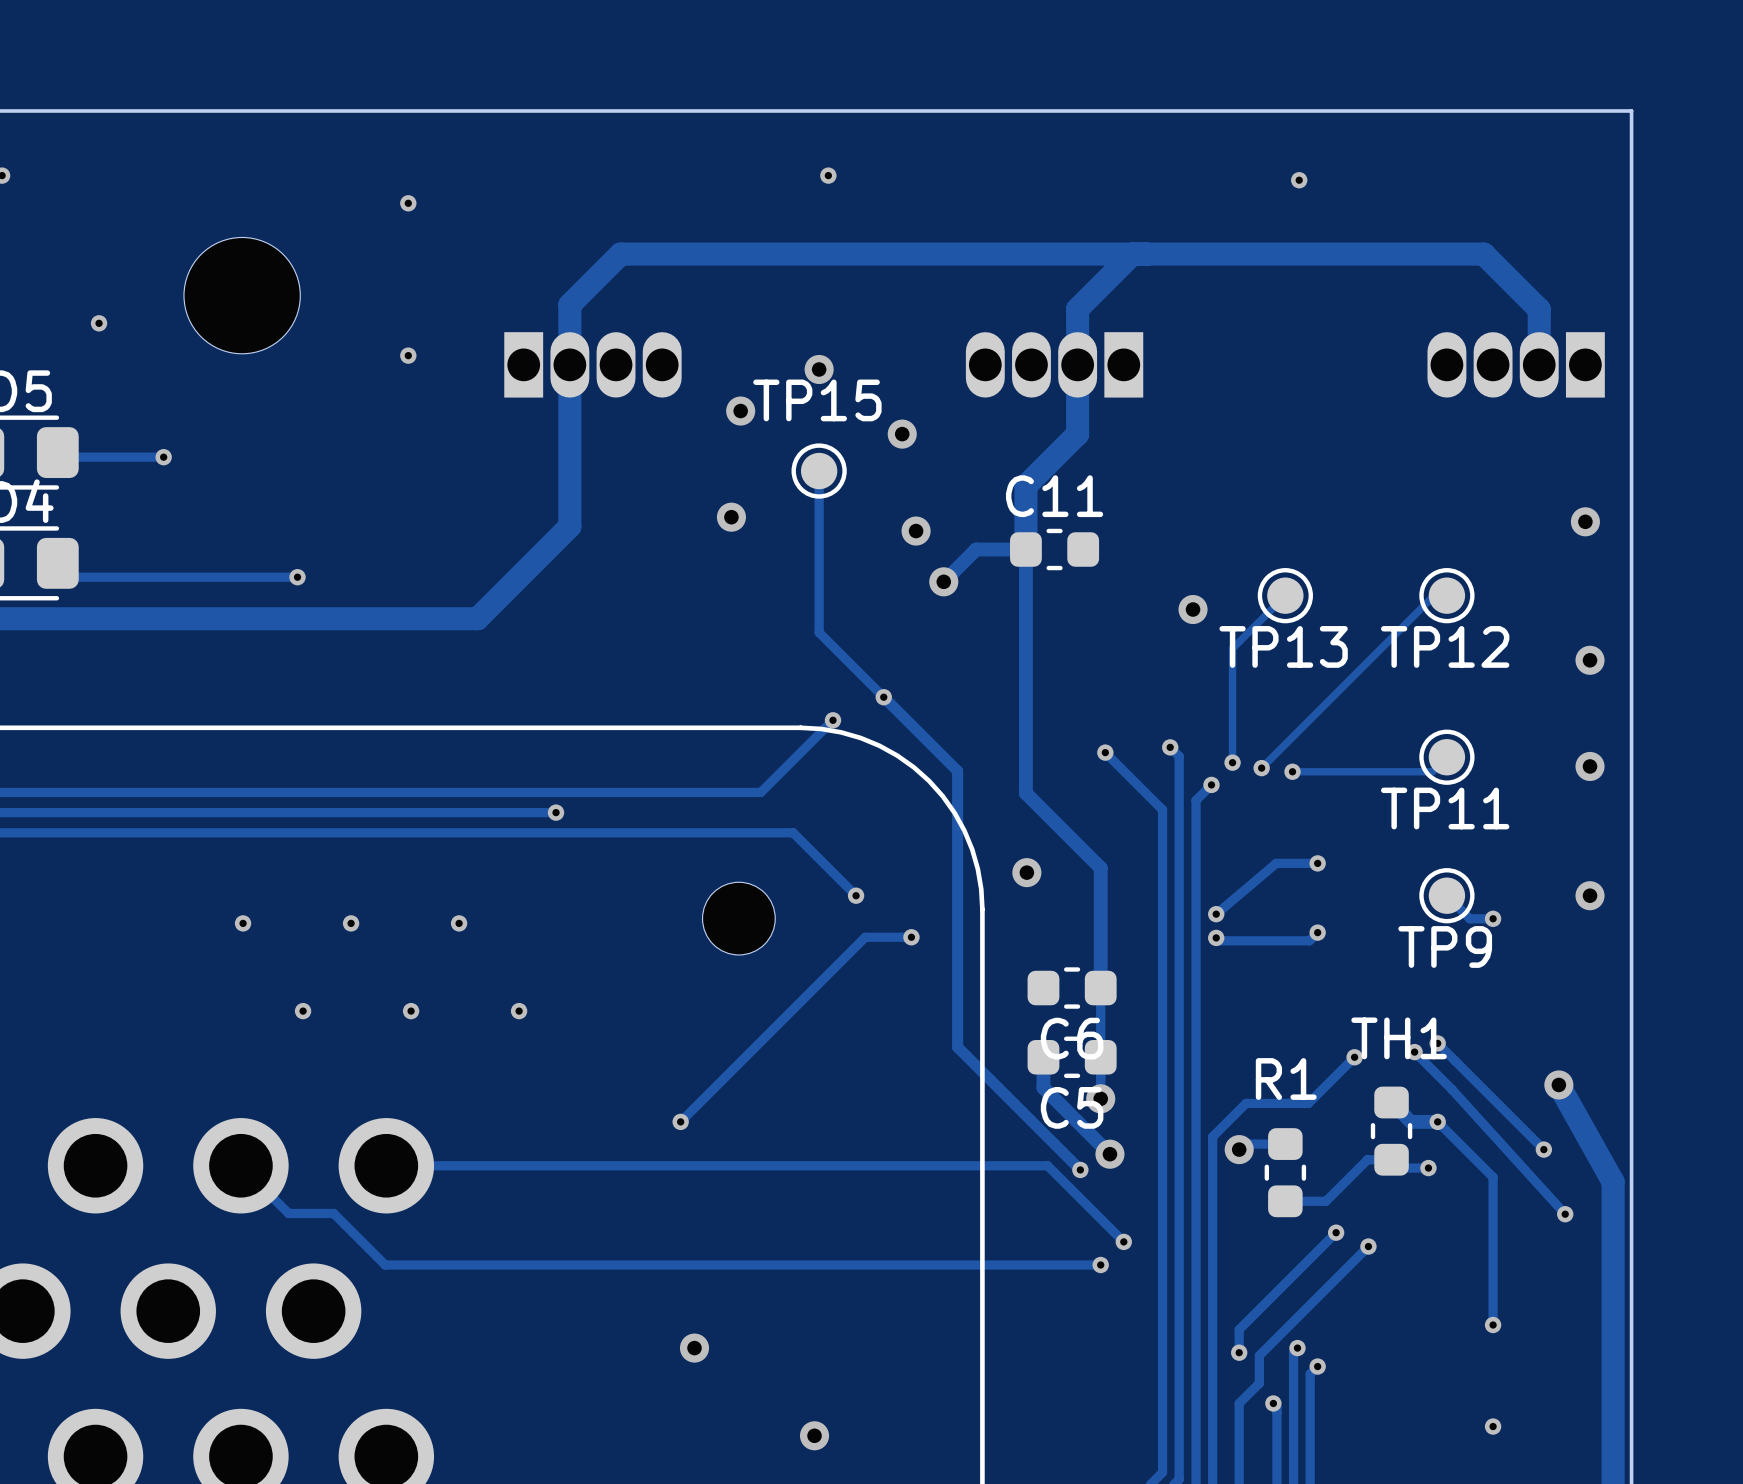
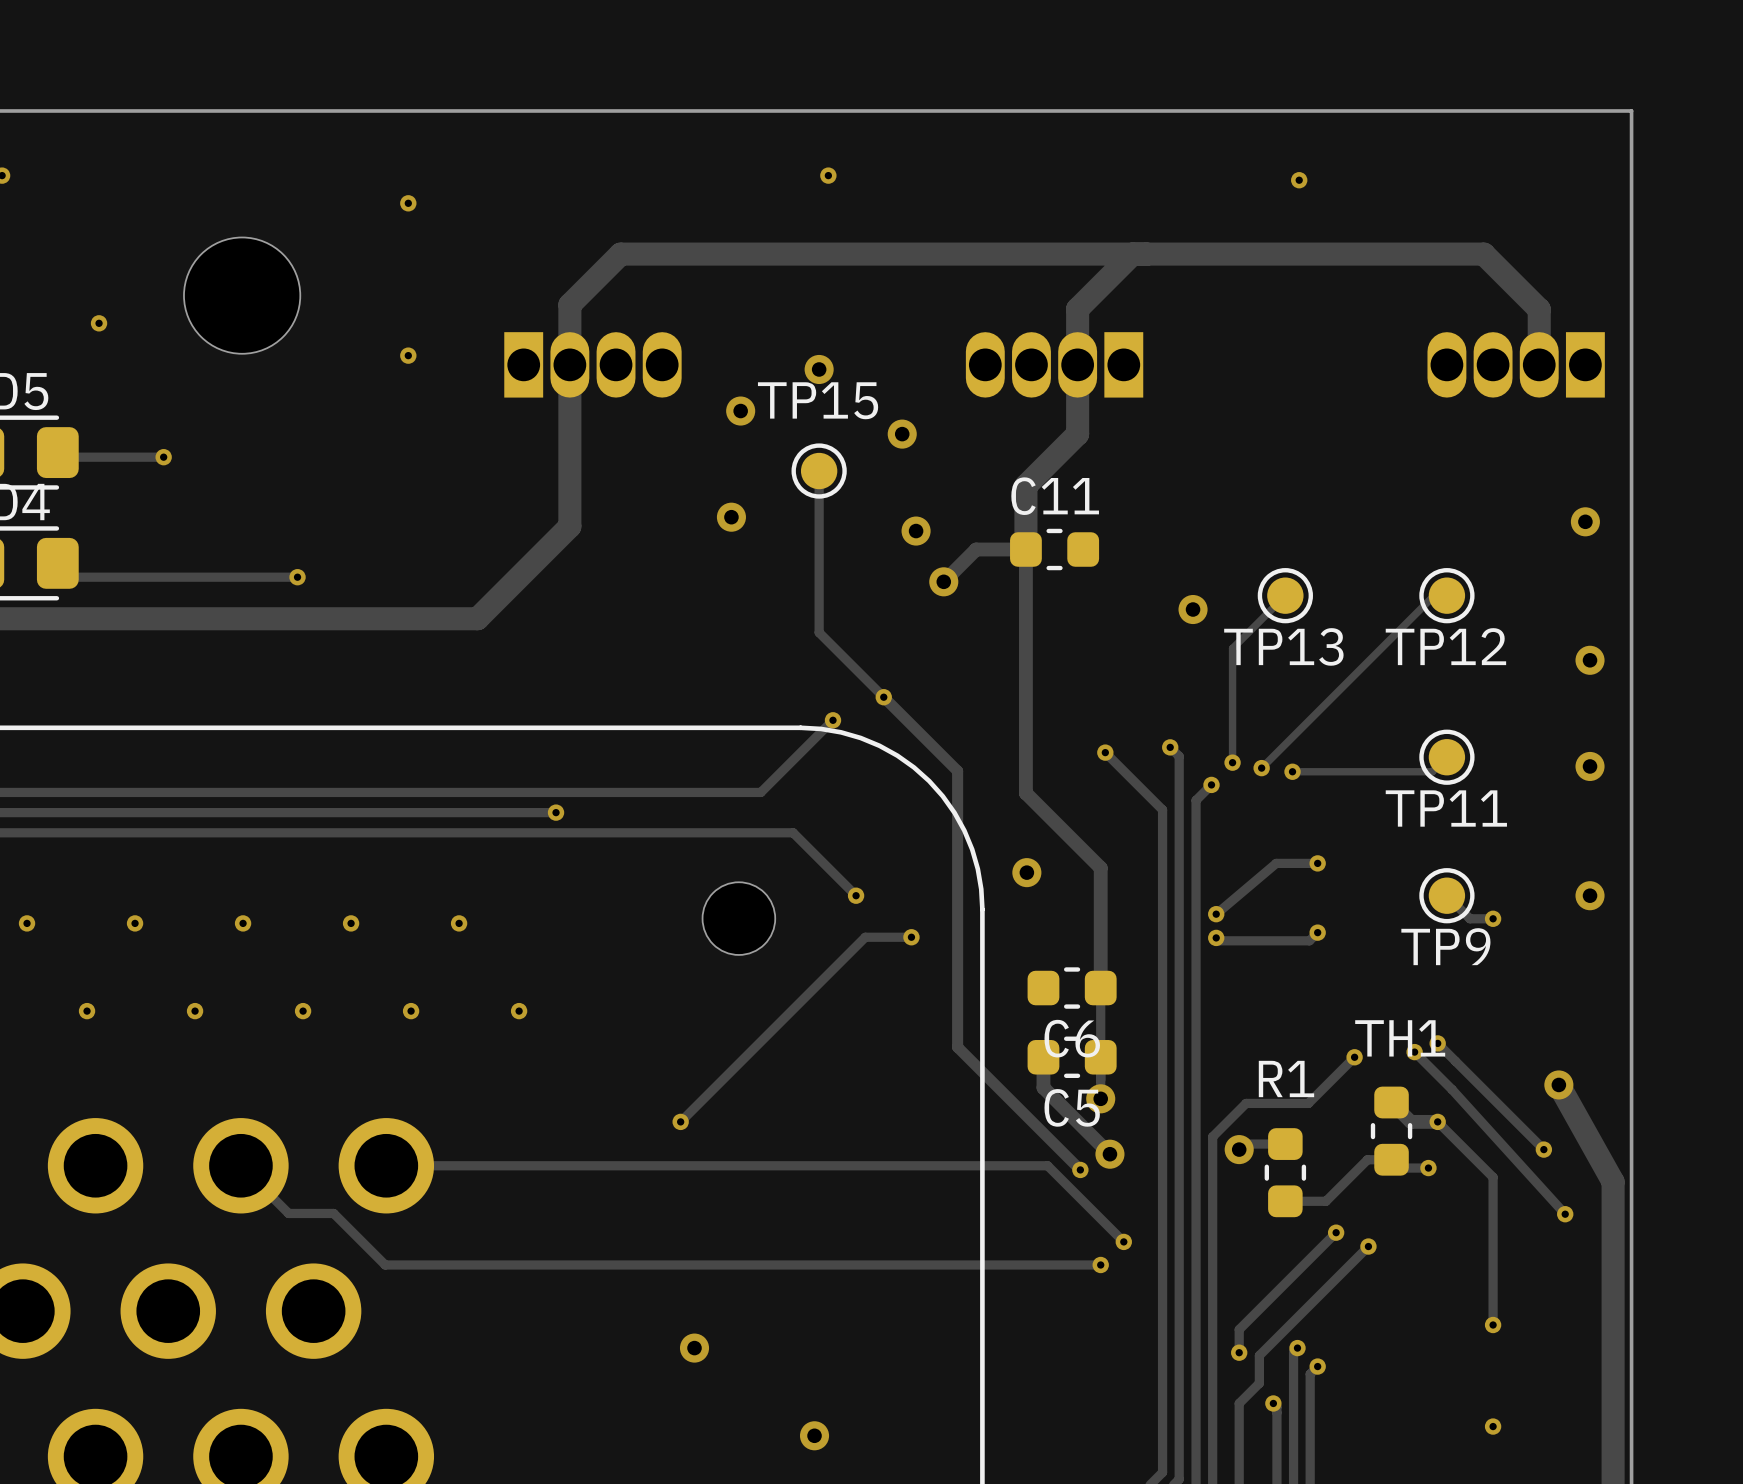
via: none -> (27, 923)
via: none -> (135, 923)
via: none -> (87, 1011)
via: none -> (195, 1011)

